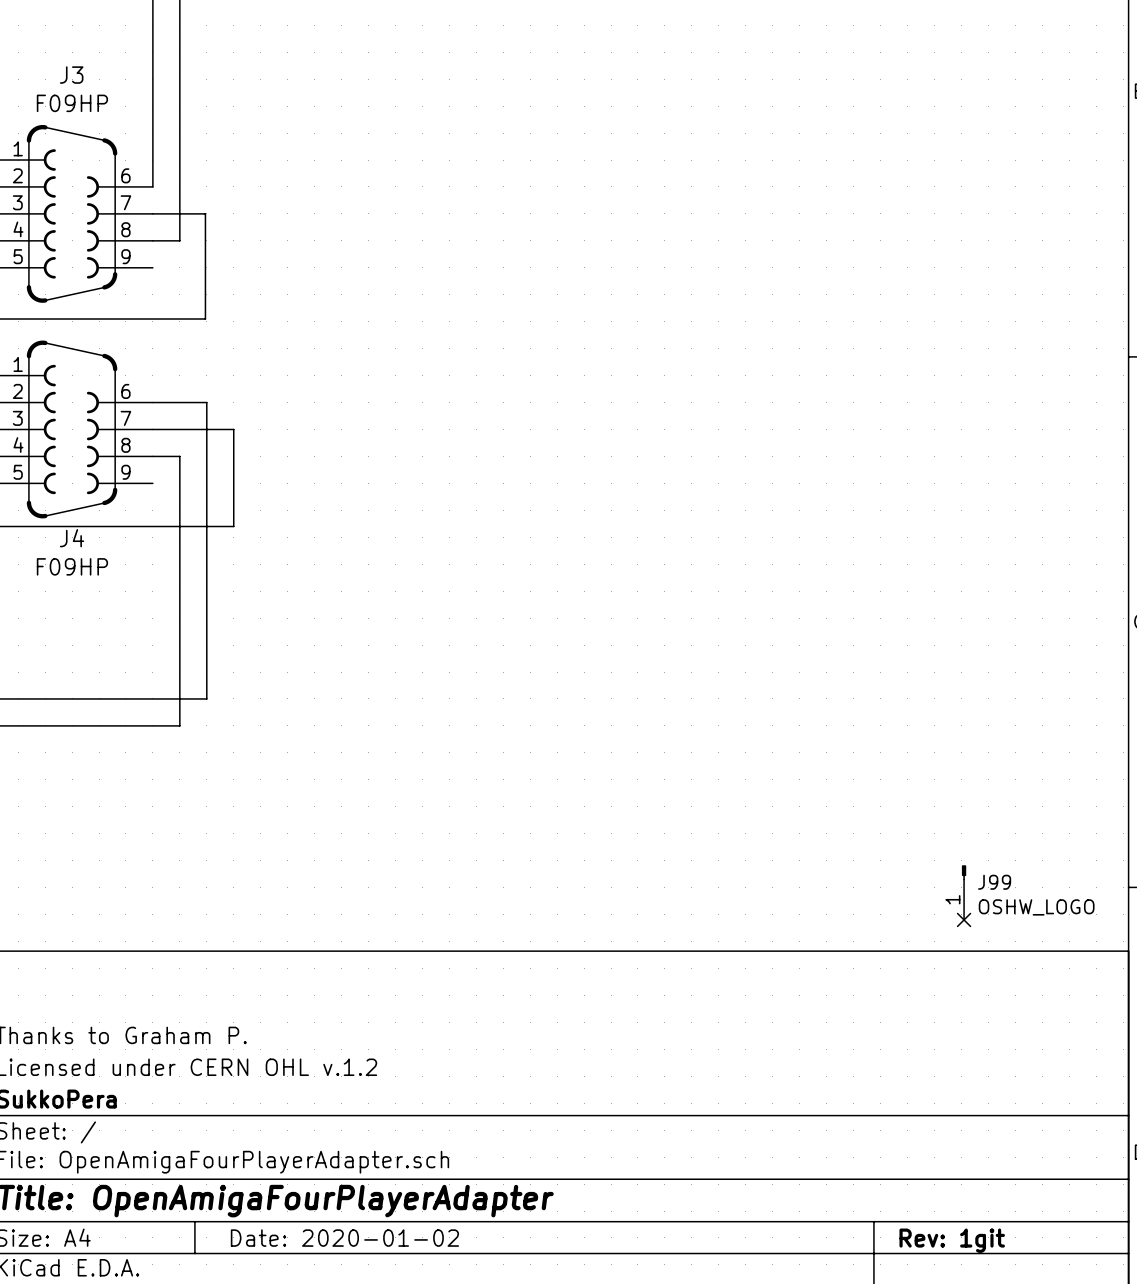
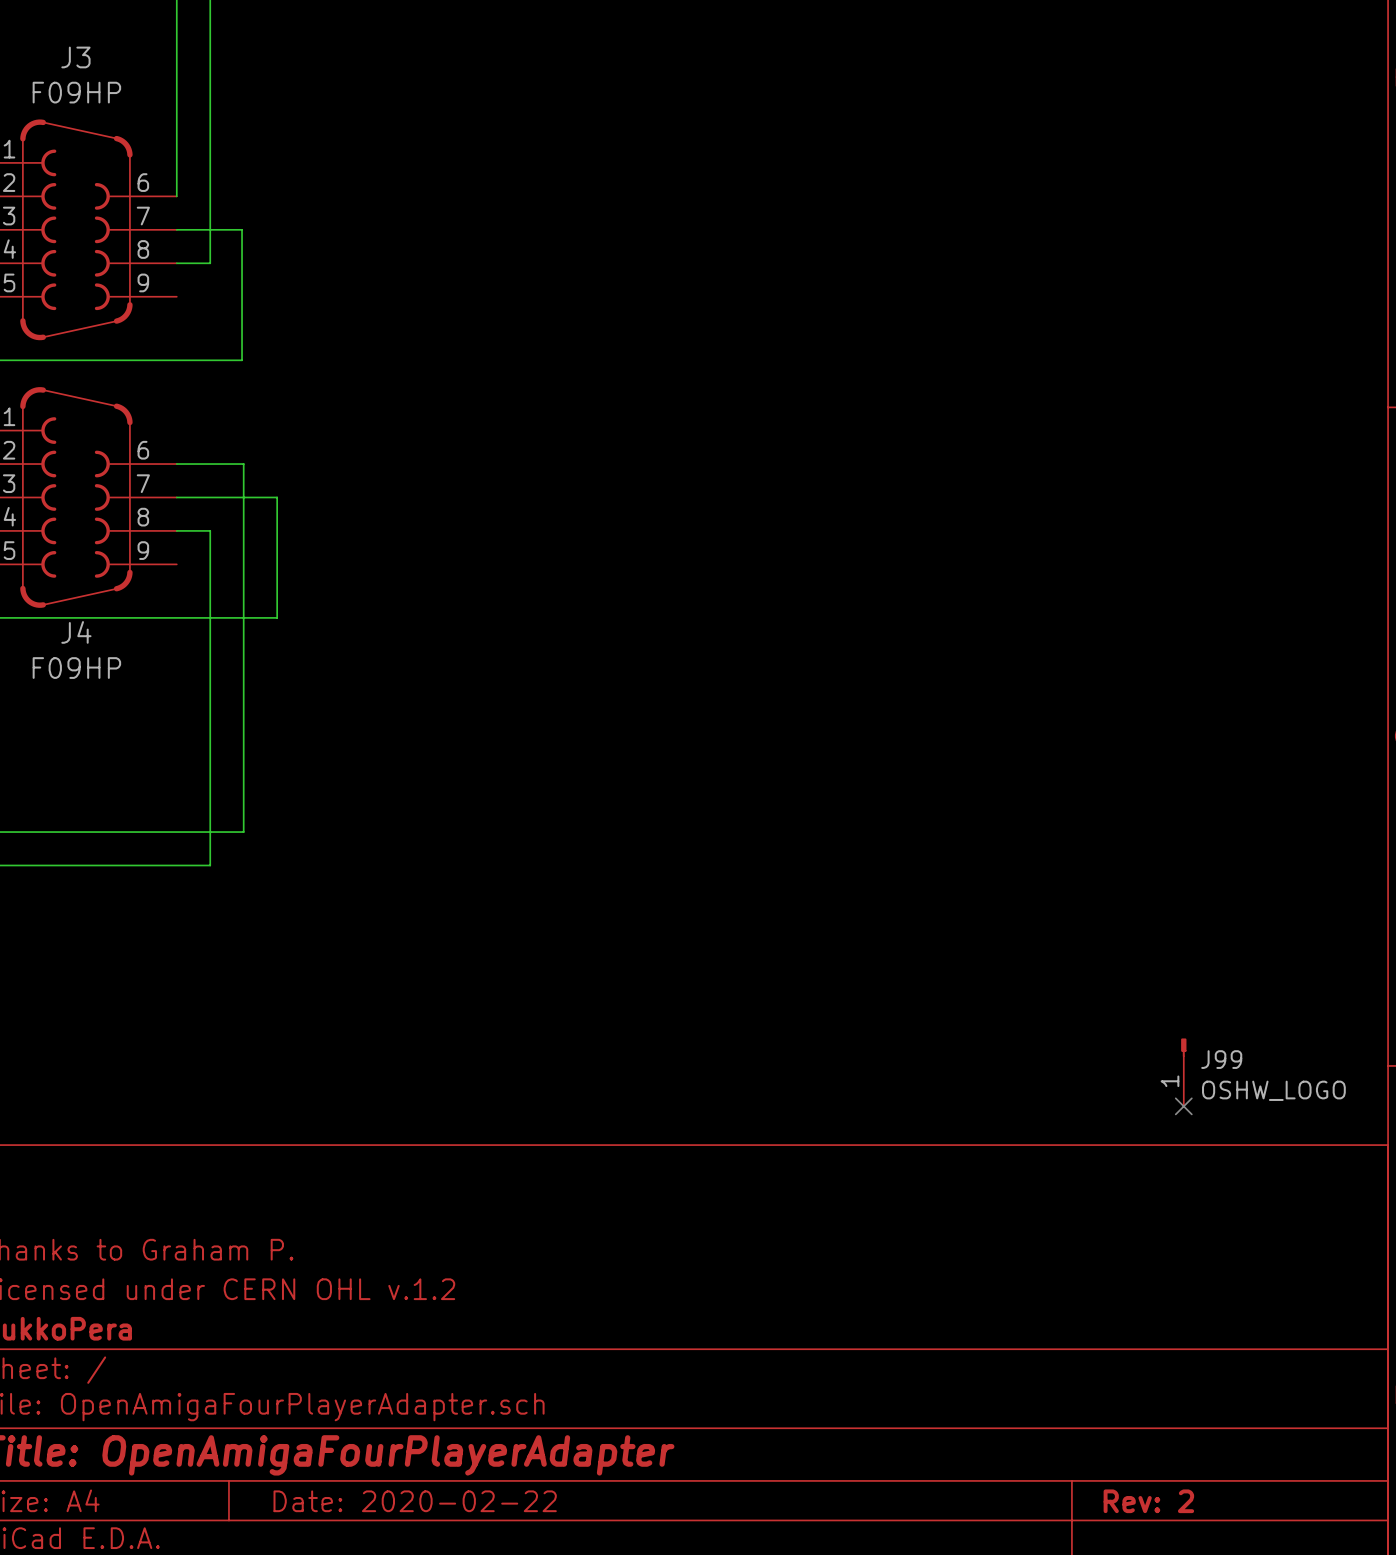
title block: Date: 2020-01-02 (344, 1238) -> Date: 2020-02-22 (415, 1501)
title block: Rev: 1git (952, 1240) -> Rev: 2 (1148, 1501)

